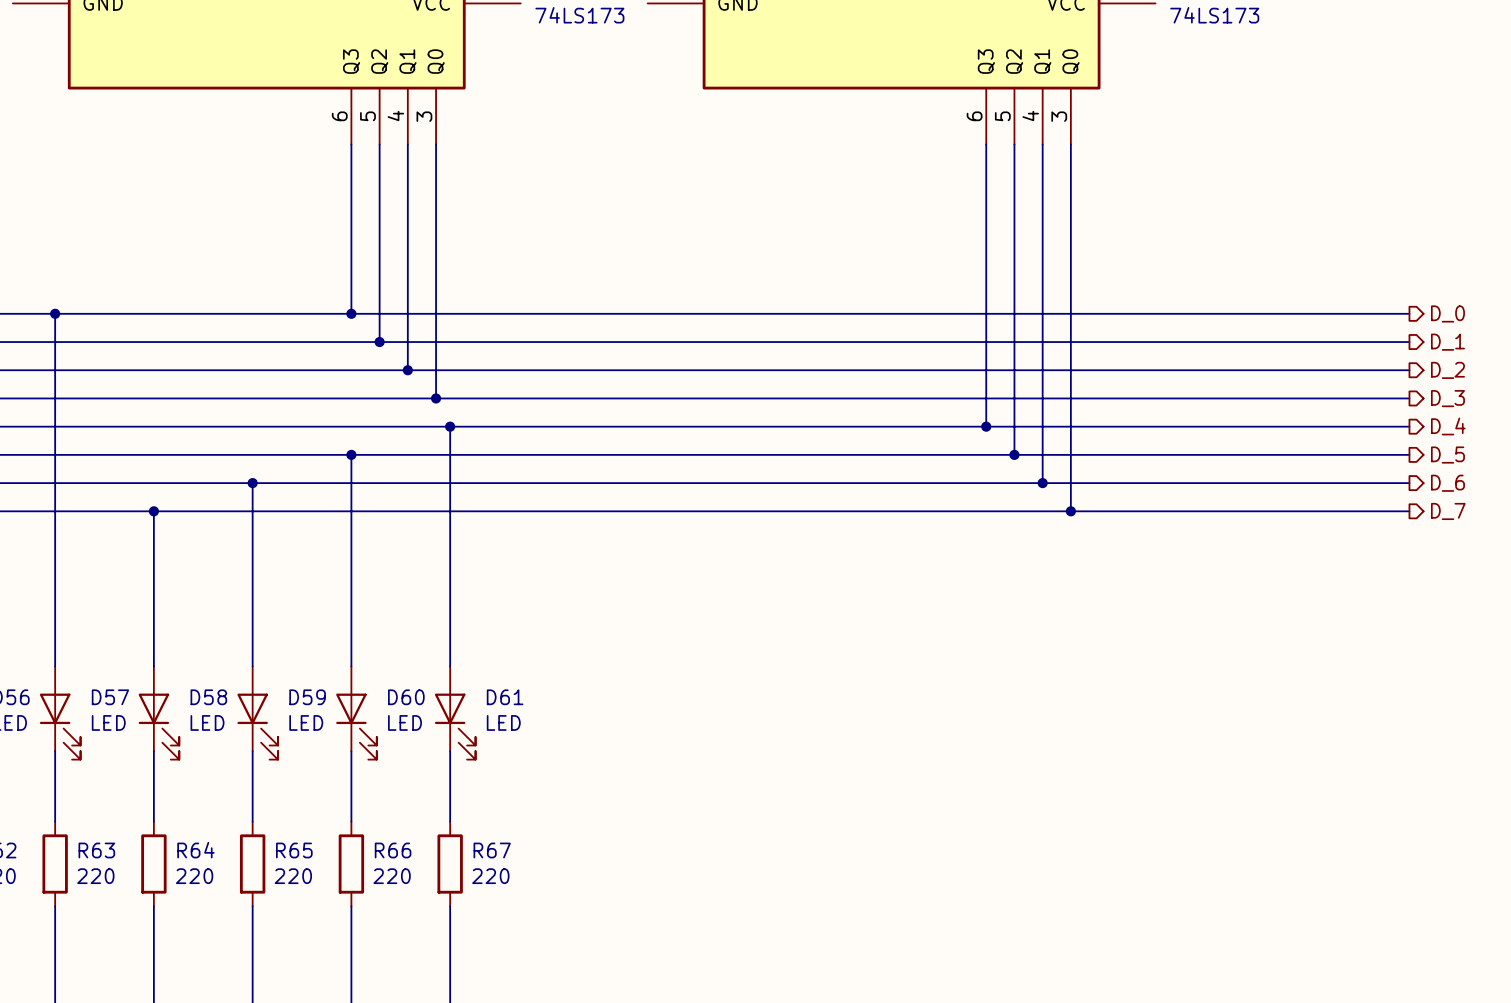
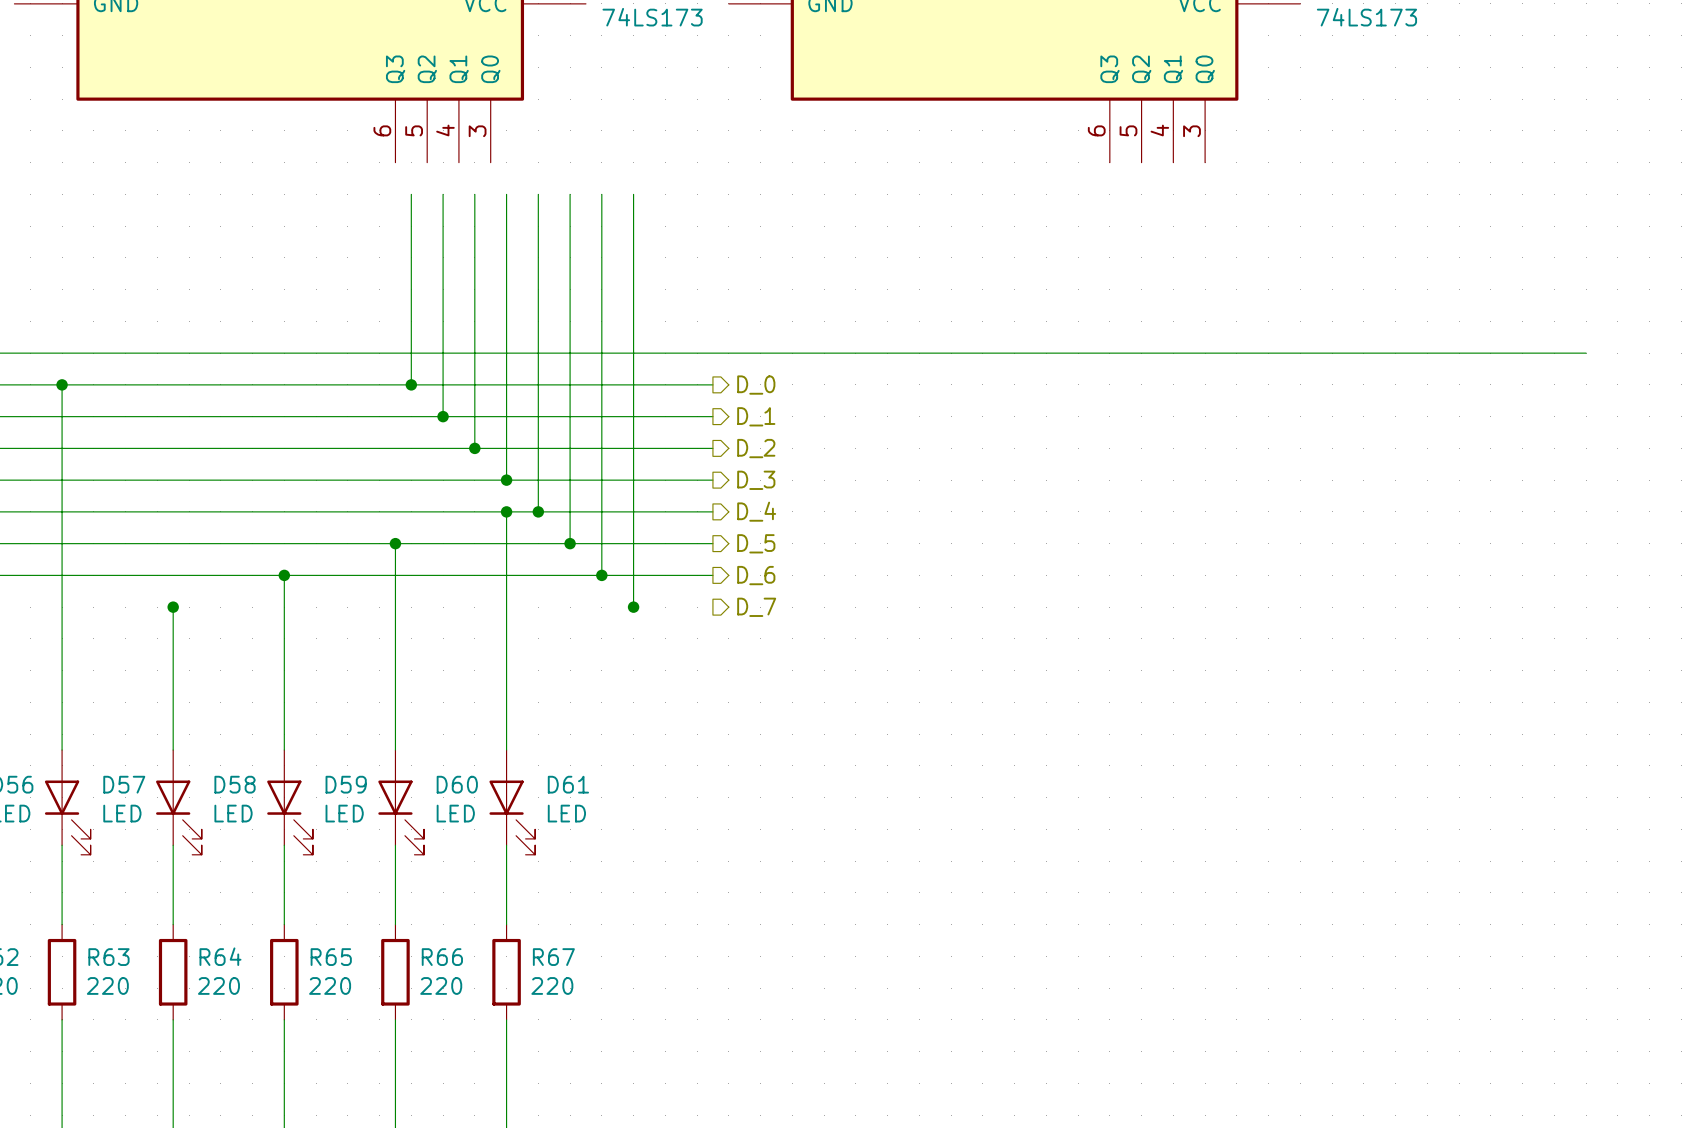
wire: (351, 144) (351, 313) -> (411, 194) (411, 384)
wire: (379, 144) (379, 342) -> (443, 194) (443, 416)
wire: (407, 144) (407, 370) -> (474, 194) (474, 448)
wire: (436, 144) (436, 398) -> none
wire: (986, 144) (986, 426) -> none
wire: (1014, 144) (1014, 454) -> none
wire: (1042, 144) (1042, 483) -> none
wire: (1070, 144) (1070, 511) -> none
wire: none -> (538, 194) (538, 511)
wire: none -> (570, 194) (570, 543)
wire: none -> (601, 194) (601, 575)
wire: none -> (633, 194) (633, 607)
wire: (55, 313) (55, 342) -> none
junction position: (55, 313) -> (62, 384)
junction: (351, 313) -> none
hierarchical label: D_0 (1447, 313) -> none
junction position: (379, 342) -> (411, 384)
wire: (633, 342) (1409, 342) -> none
hierarchical label: none -> D_0 (756, 385)
hierarchical label: D_1 (1447, 342) -> none
junction position: (407, 370) -> (443, 416)
wire: (633, 370) (1409, 370) -> none
hierarchical label: none -> D_1 (756, 416)
hierarchical label: D_2 (1447, 370) -> none
junction position: (436, 398) -> (474, 448)
wire: (633, 398) (1409, 398) -> none
hierarchical label: none -> D_2 (756, 448)
hierarchical label: D_3 (1447, 398) -> none
wire: (450, 426) (450, 454) -> (506, 480) (506, 194)
wire: (633, 426) (1409, 426) -> none
hierarchical label: none -> D_3 (756, 480)
junction: (986, 426) -> none
hierarchical label: D_4 (1448, 426) -> none
wire: (351, 454) (351, 483) -> none
junction position: (351, 454) -> (395, 543)
junction: none -> (506, 511)
junction: none -> (538, 511)
wire: (633, 454) (1409, 454) -> none
hierarchical label: none -> D_4 (756, 511)
junction: (1014, 454) -> none
hierarchical label: D_5 (1447, 455) -> none
wire: (252, 483) (252, 511) -> none
junction position: (252, 483) -> (284, 575)
junction: none -> (570, 543)
wire: (633, 483) (1409, 483) -> none
hierarchical label: none -> D_5 (756, 543)
junction: (1042, 483) -> none
hierarchical label: D_6 (1447, 483) -> none
wire: (153, 511) (153, 539) -> none
junction position: (153, 511) -> (173, 607)
junction: none -> (601, 575)
wire: (633, 511) (1409, 511) -> none
hierarchical label: none -> D_6 (756, 575)
junction: (1070, 511) -> none
hierarchical label: D_7 (1448, 511) -> none
junction: none -> (633, 607)
hierarchical label: none -> D_7 (756, 607)

